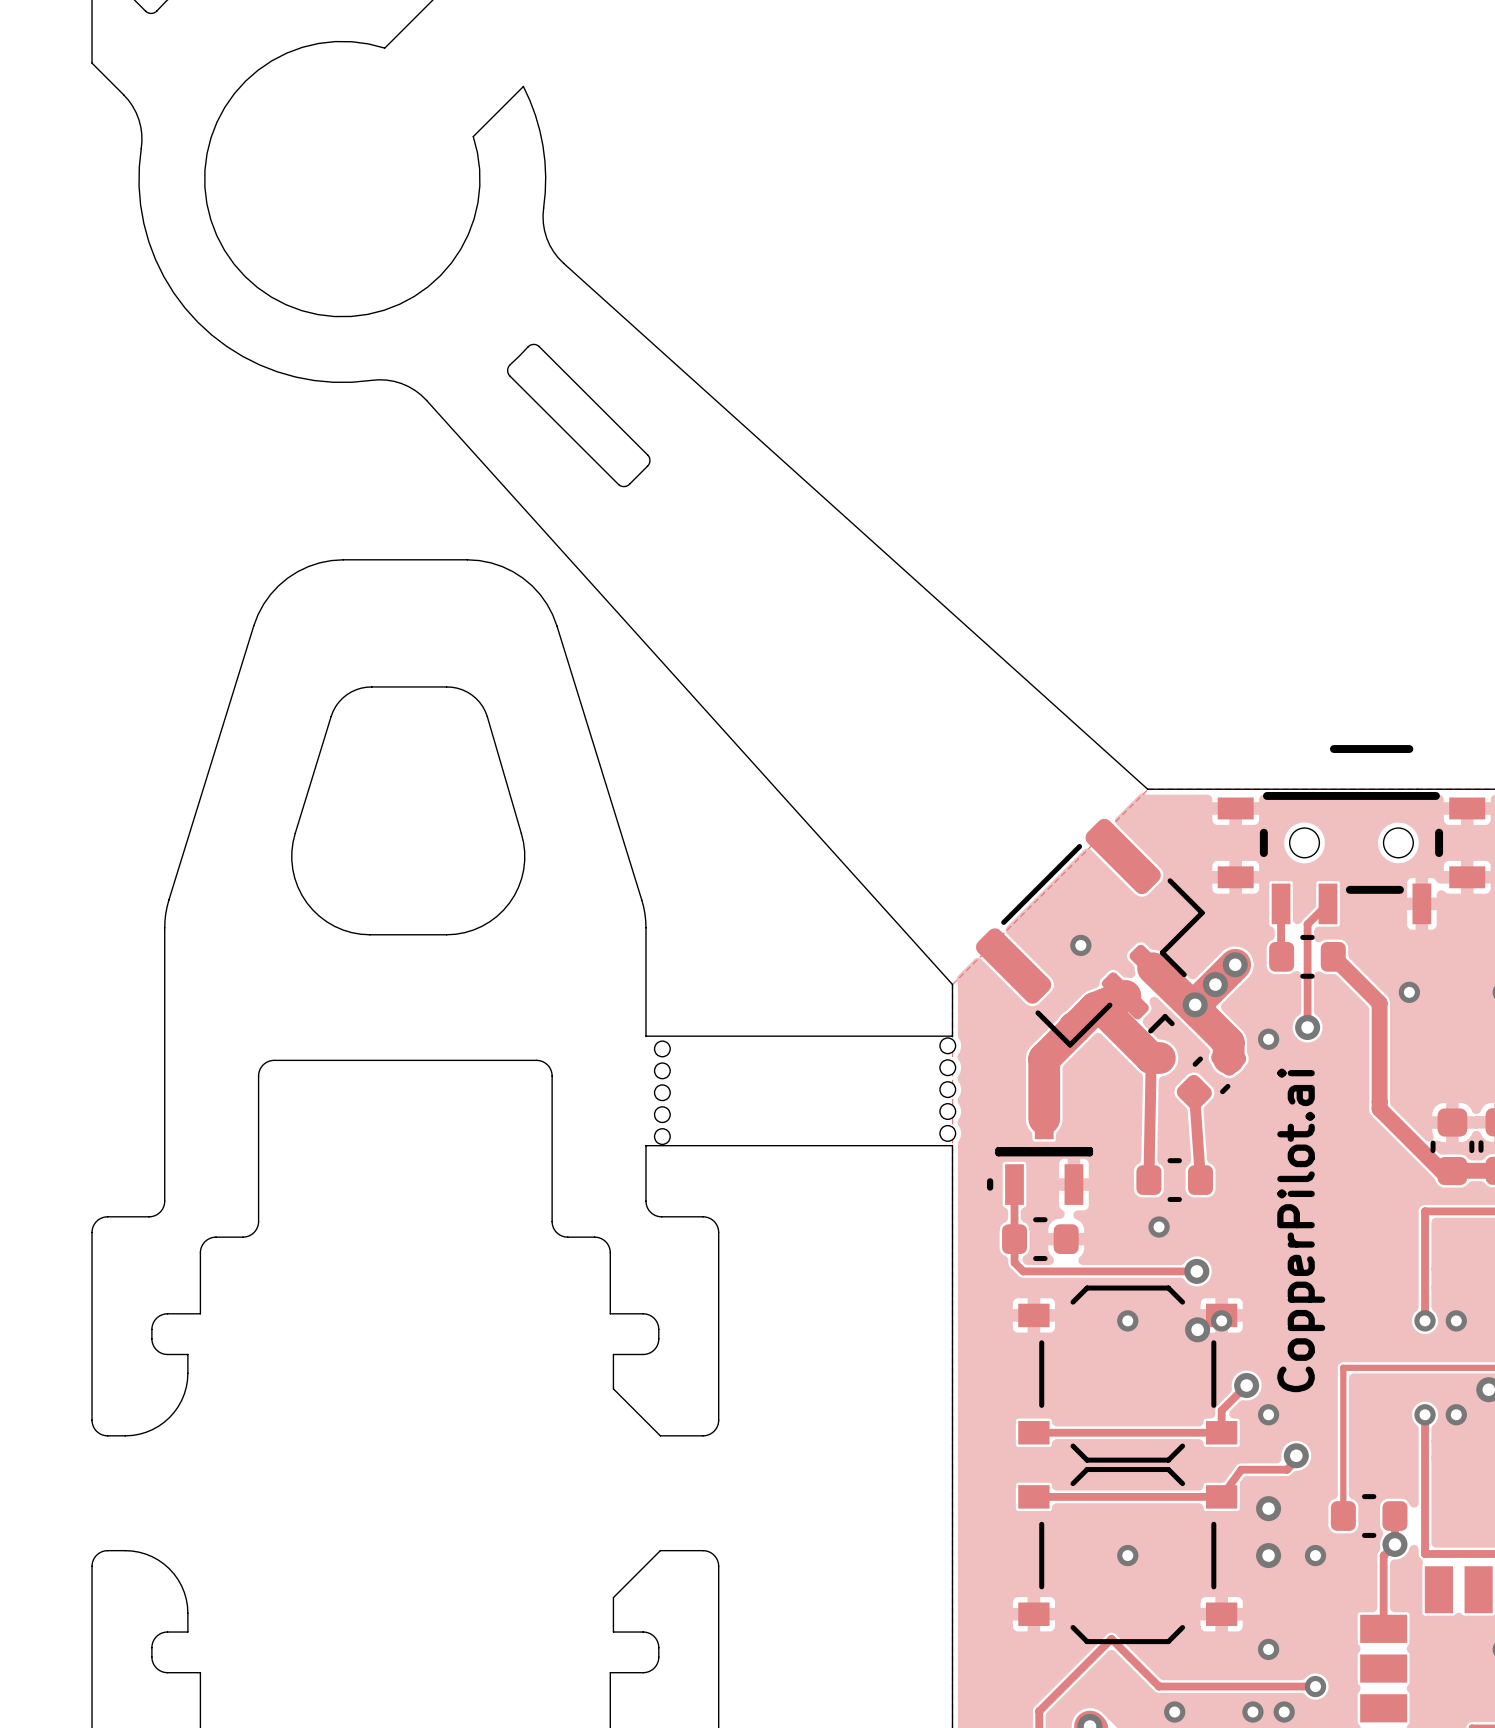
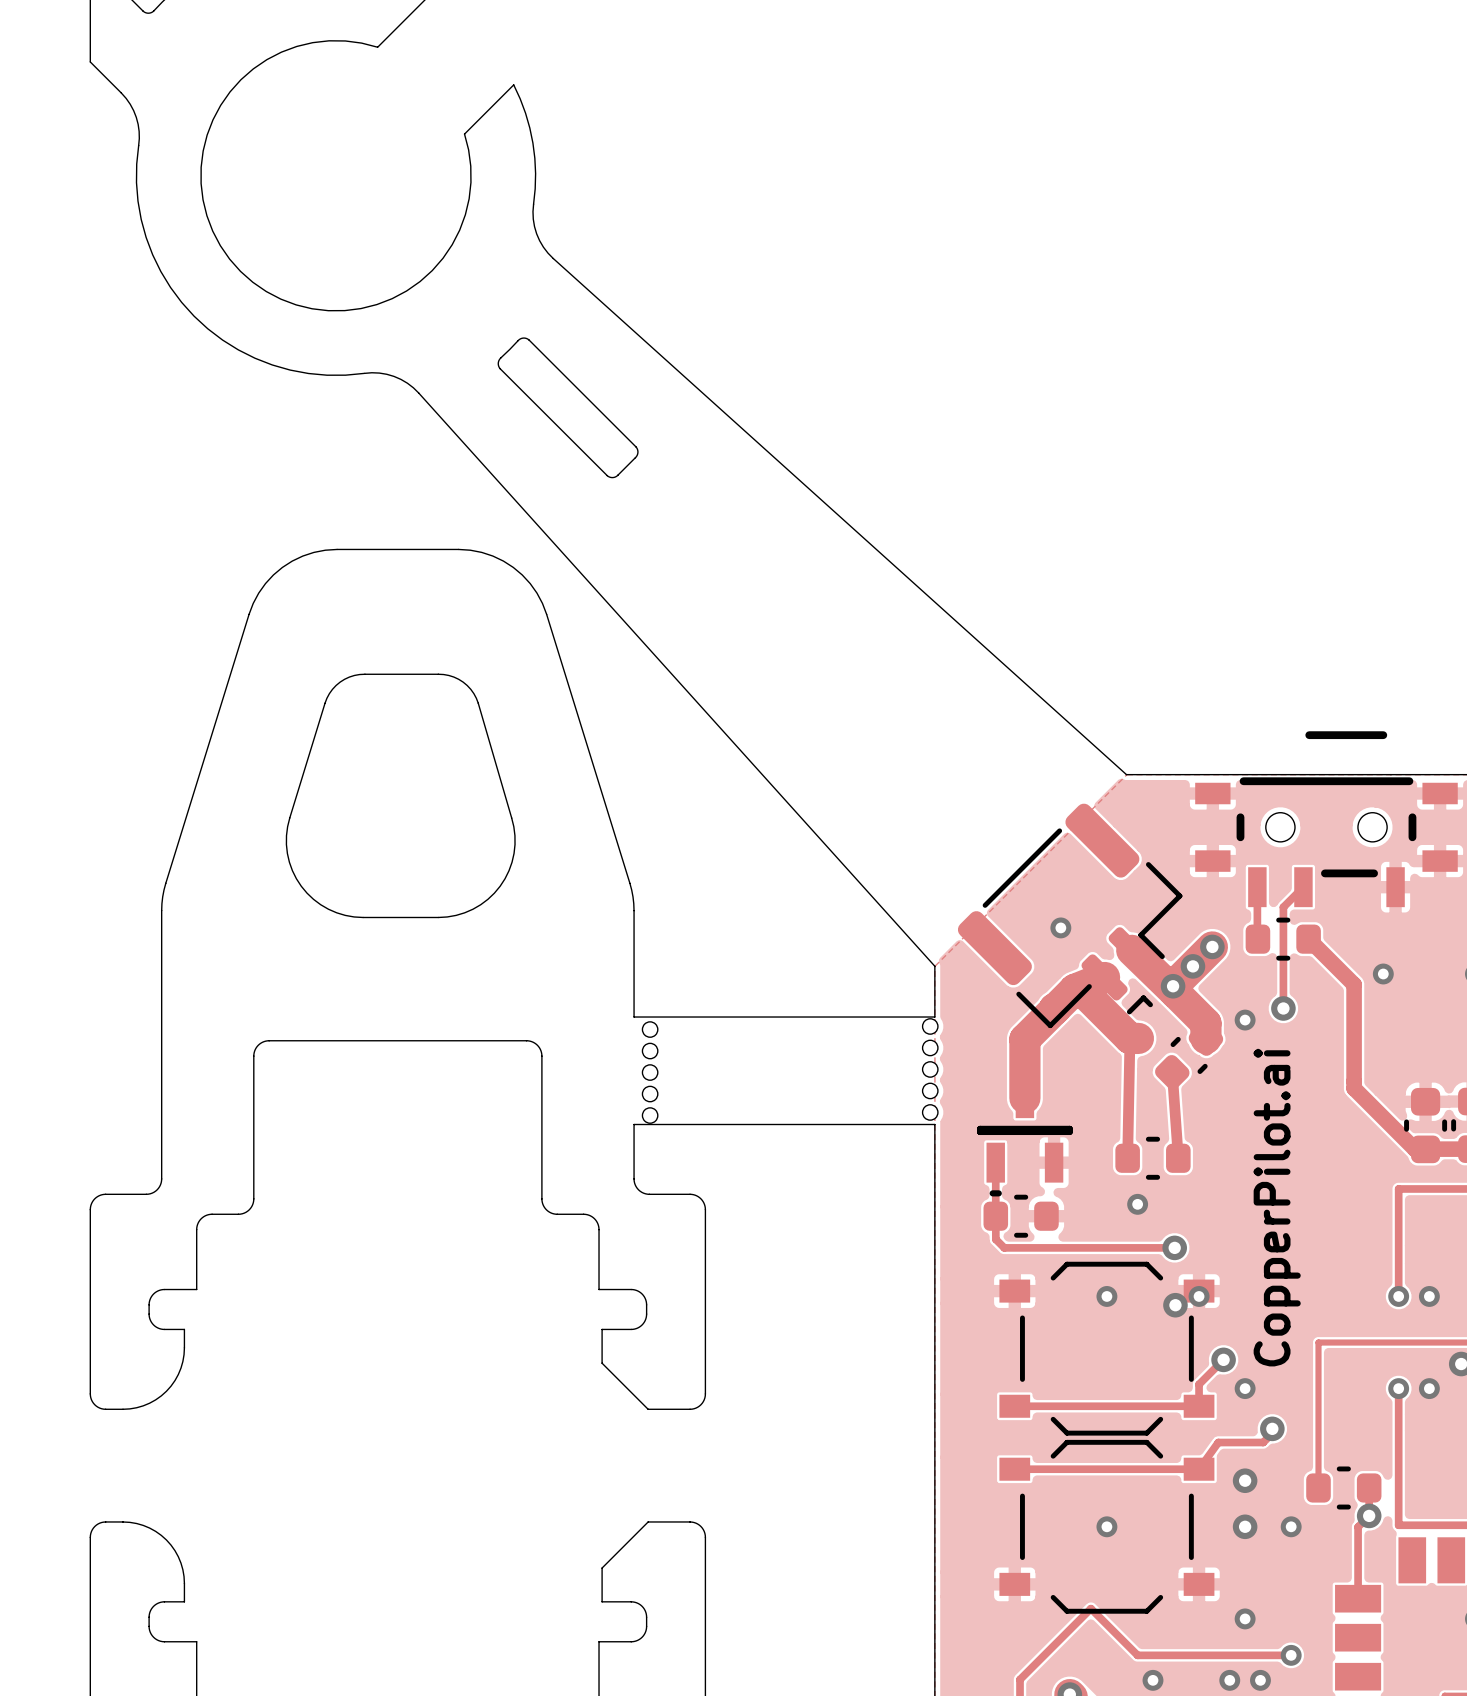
part footprint: [986, 1098, 1094, 1205] -> [977, 1078, 1073, 1197]

